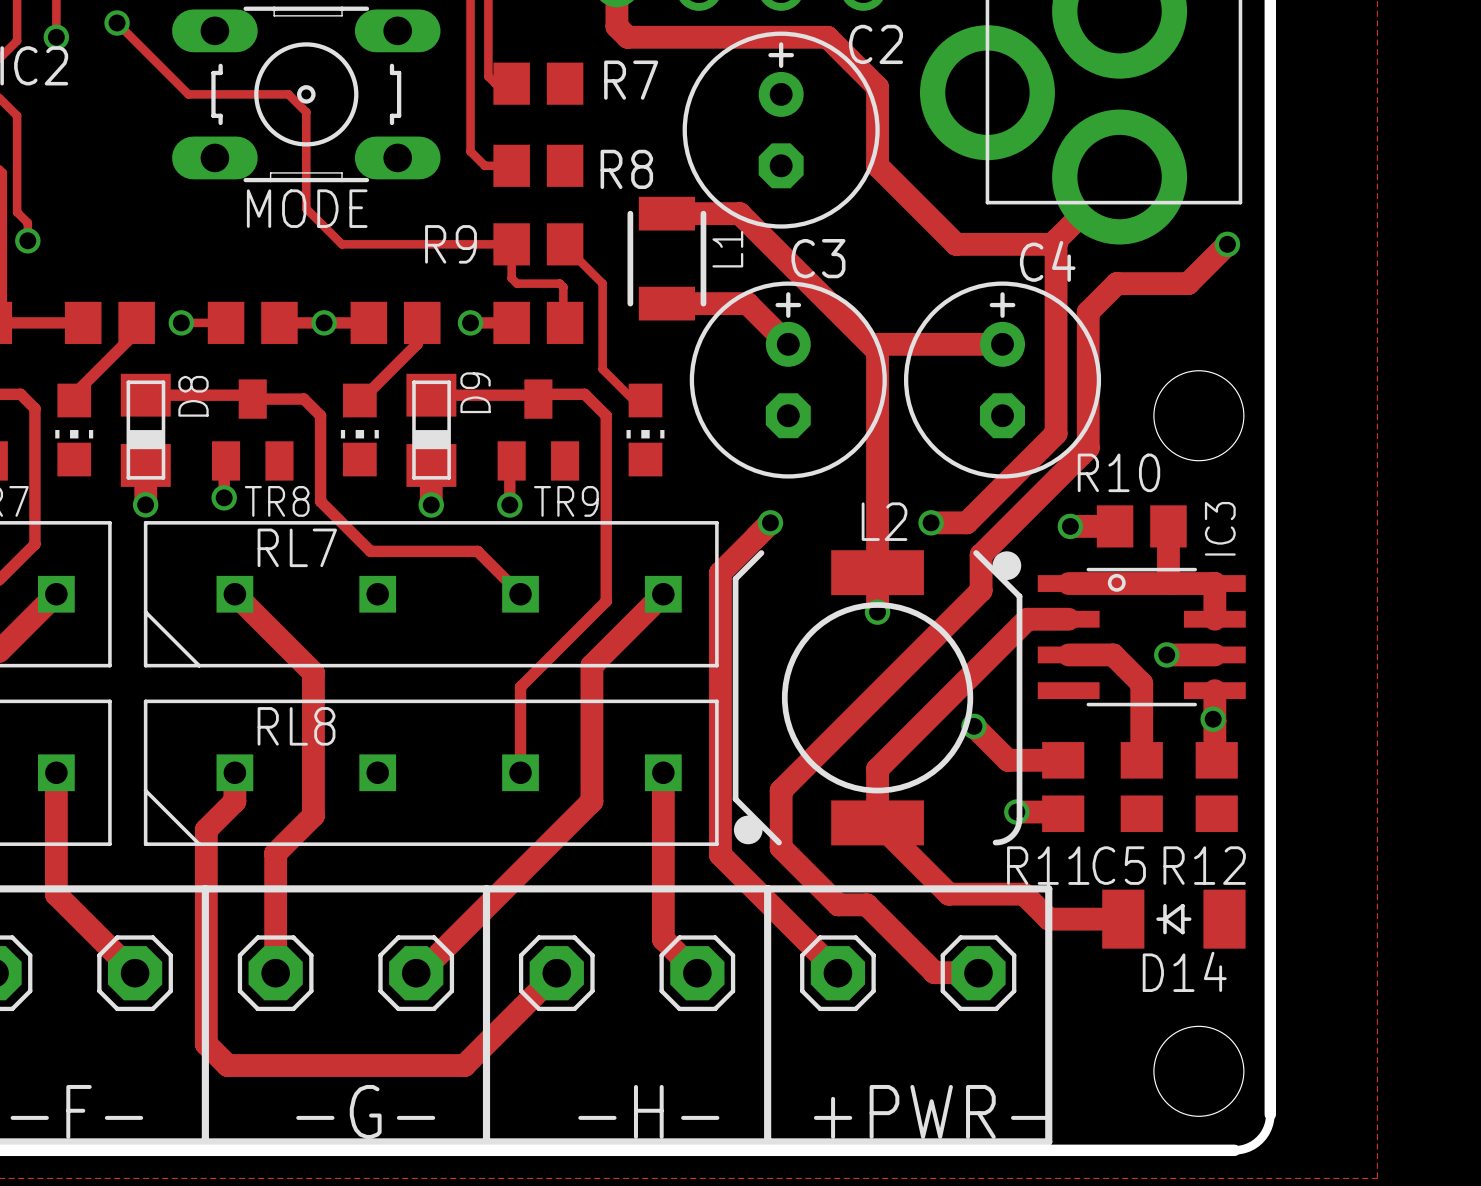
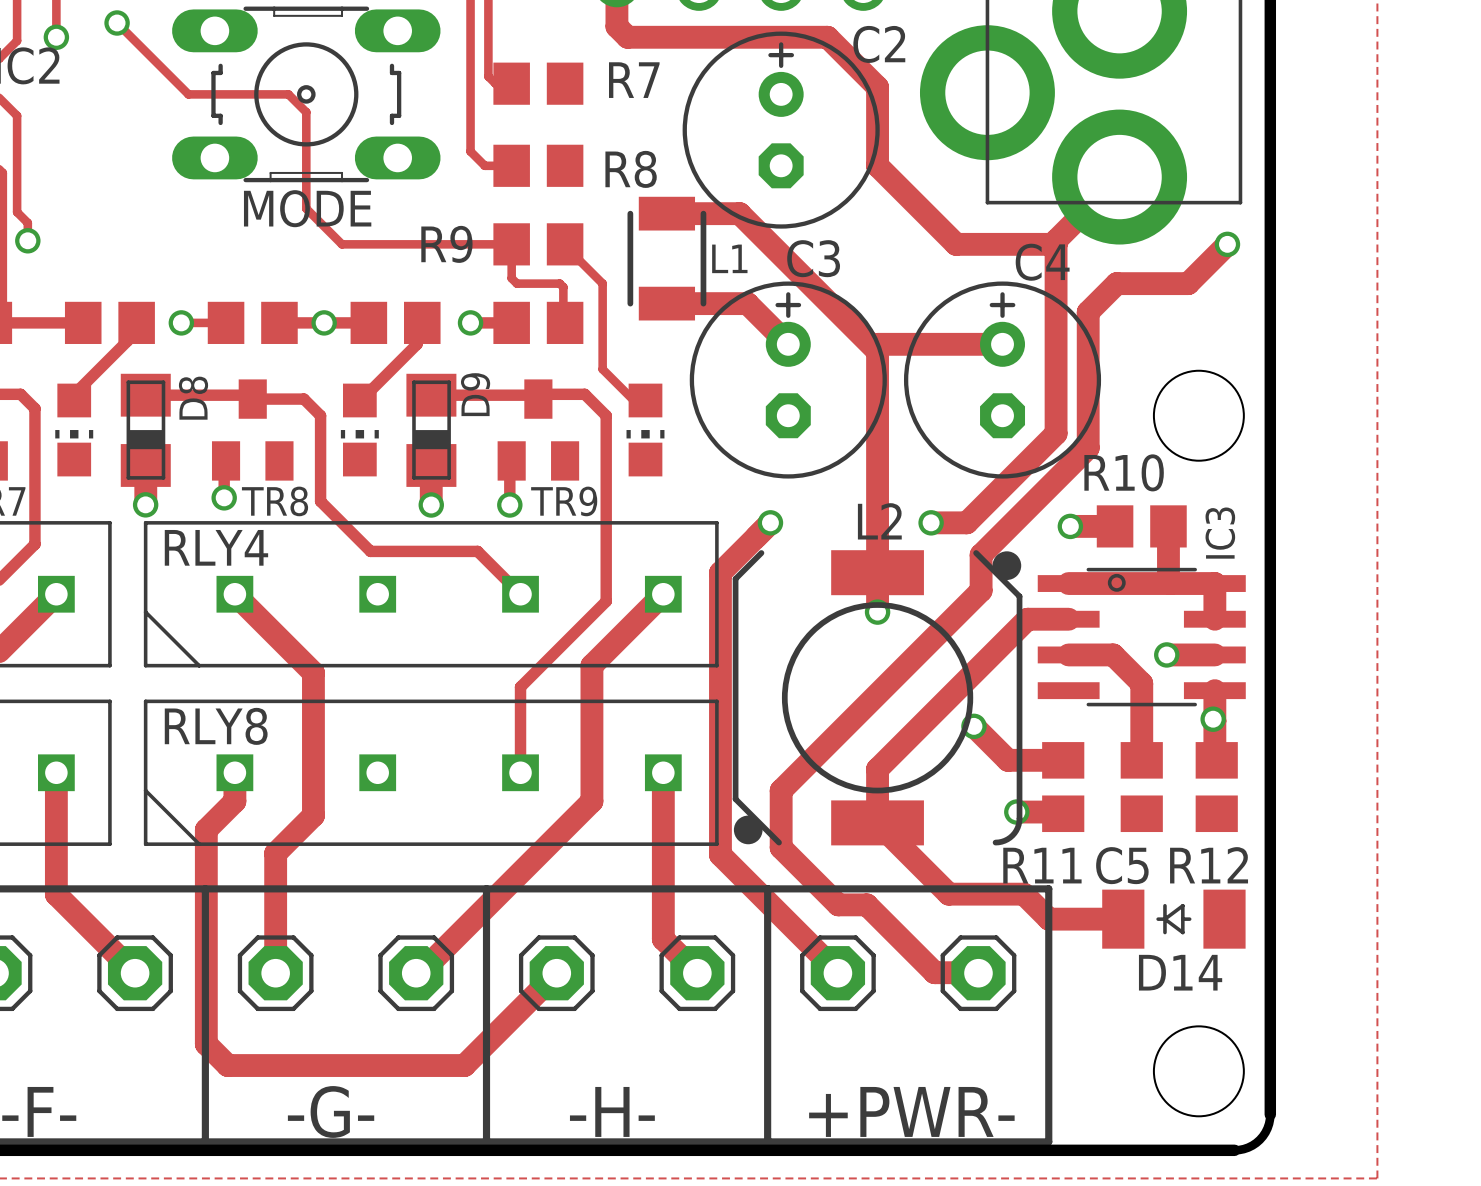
L1 name rotation: 0° (727, 249) -> 90° clockwise (729, 258)
RL7 name: RL7 (297, 547) -> RLY4 (216, 547)
RL8 name: RL8 (296, 726) -> RLY8 (216, 726)

